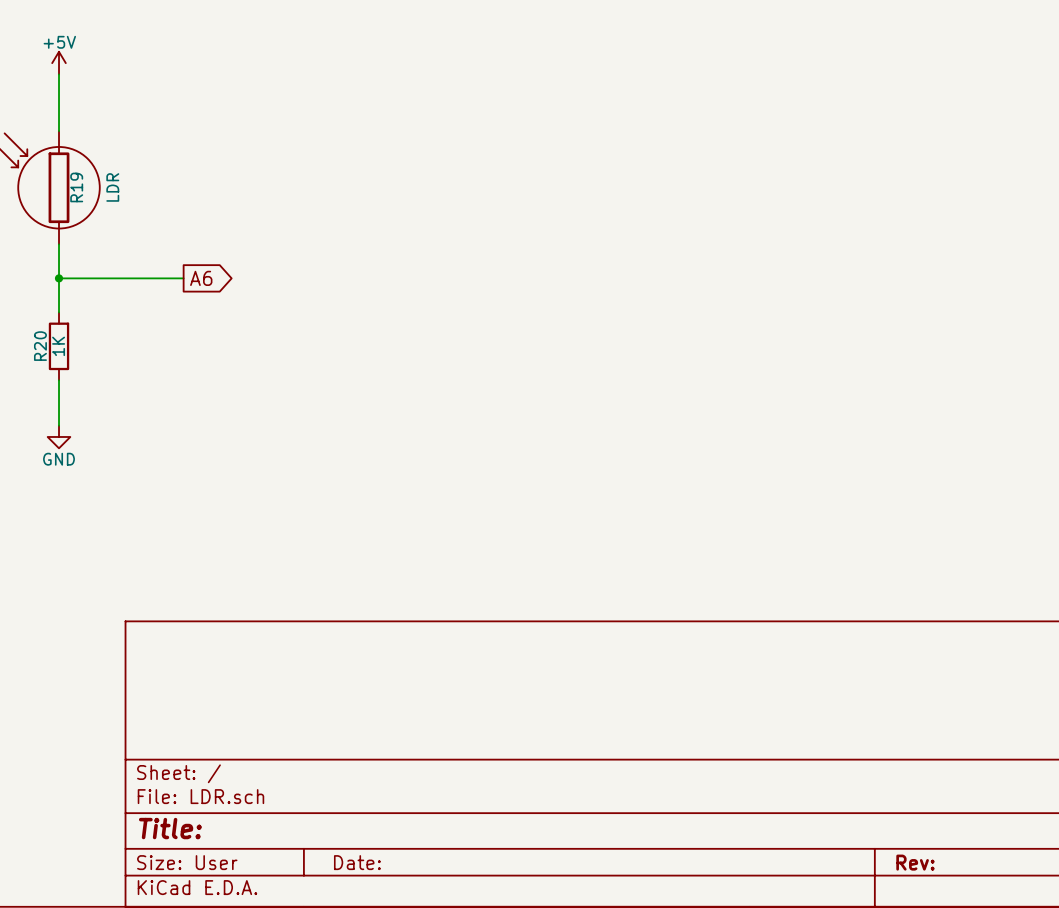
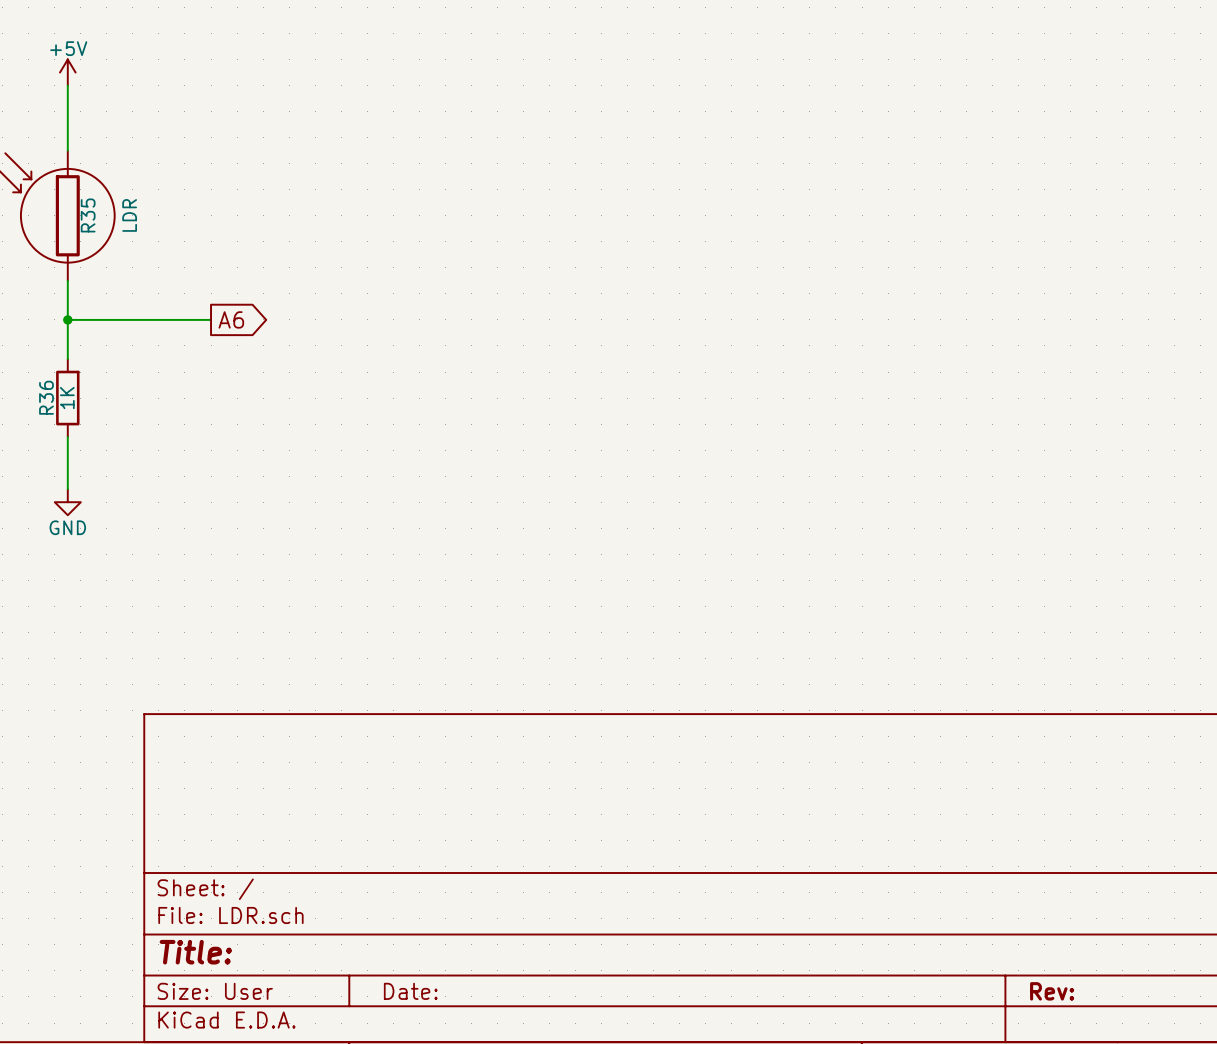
R19 name: R19 (76, 187) -> R35 (88, 215)
R20 name: R20 (40, 346) -> R36 (46, 397)

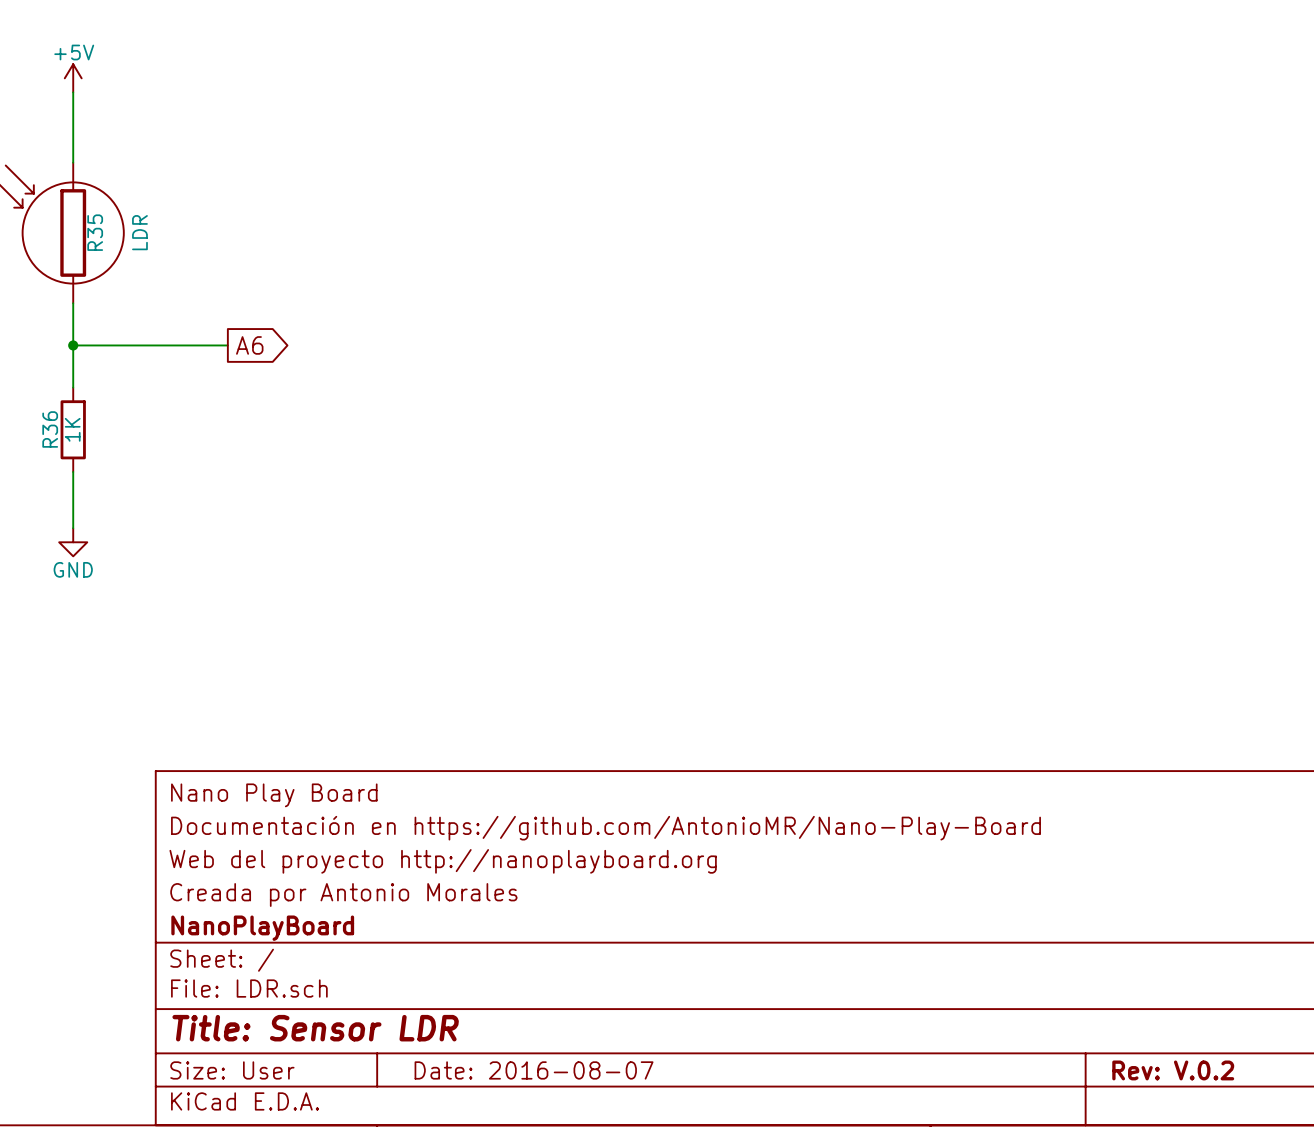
title block: none -> Nano Play Board (274, 795)
title block: none -> Documentación en https://github.com/AntonioMR/Nano-Play-Board (606, 828)
title block: none -> Web del proyecto http://nanoplayboard.org (443, 861)
title block: none -> Creada por Antonio Morales (343, 894)
title block: none -> NanoPlayBoard (262, 928)
title block: Title: (195, 952) -> Title: Sensor LDR (315, 1028)
title block: Date: (410, 991) -> Date: 2016-08-07 (534, 1070)
title block: Rev: (1052, 991) -> Rev: V.0.2 (1173, 1070)

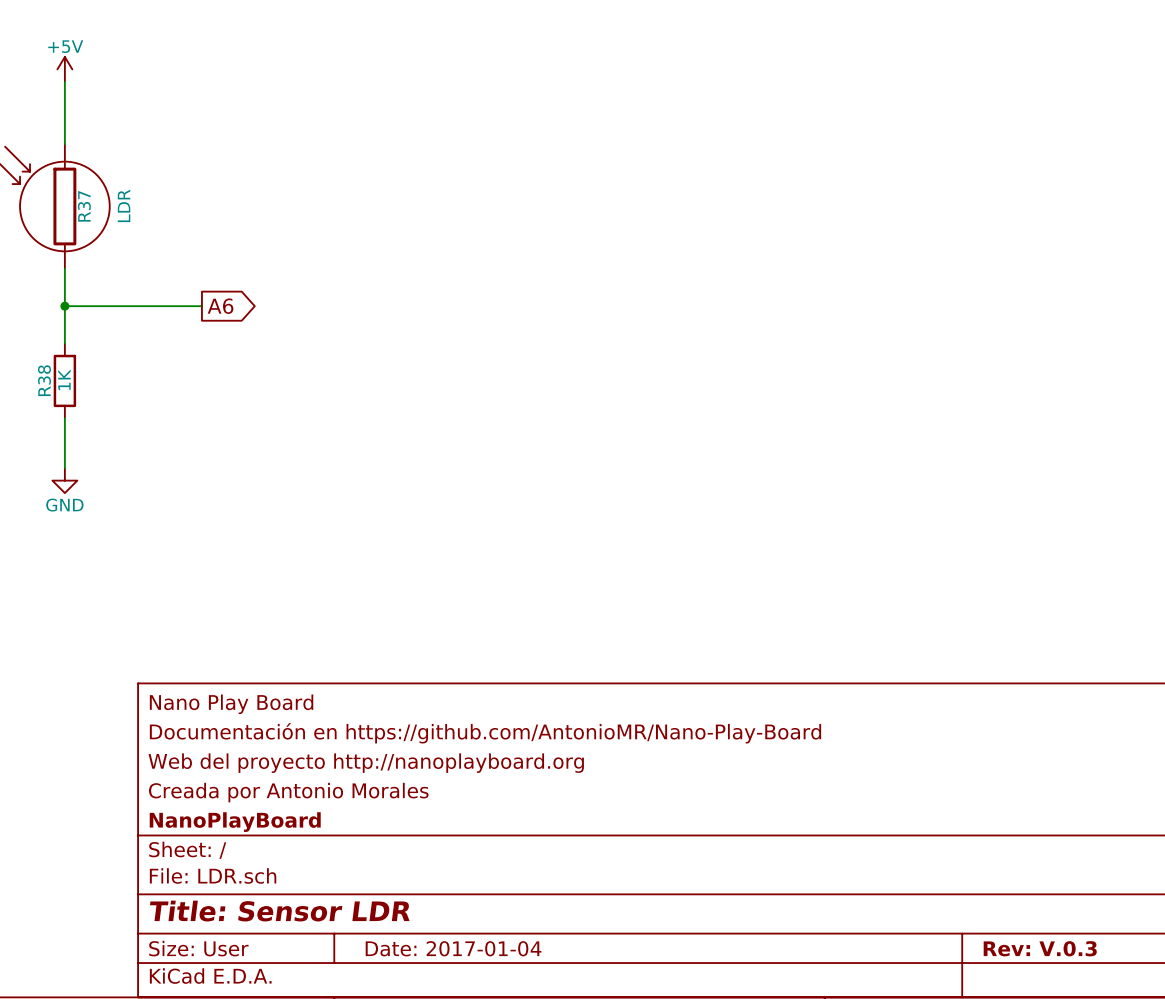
R35 name: R35 (95, 232) -> R37 (84, 206)
R36 name: R36 (50, 429) -> R38 (44, 380)
title block: Date: 2016-08-07 (534, 1070) -> Date: 2017-01-04 (453, 948)
title block: Rev: V.0.2 (1173, 1070) -> Rev: V.0.3 (1040, 948)

